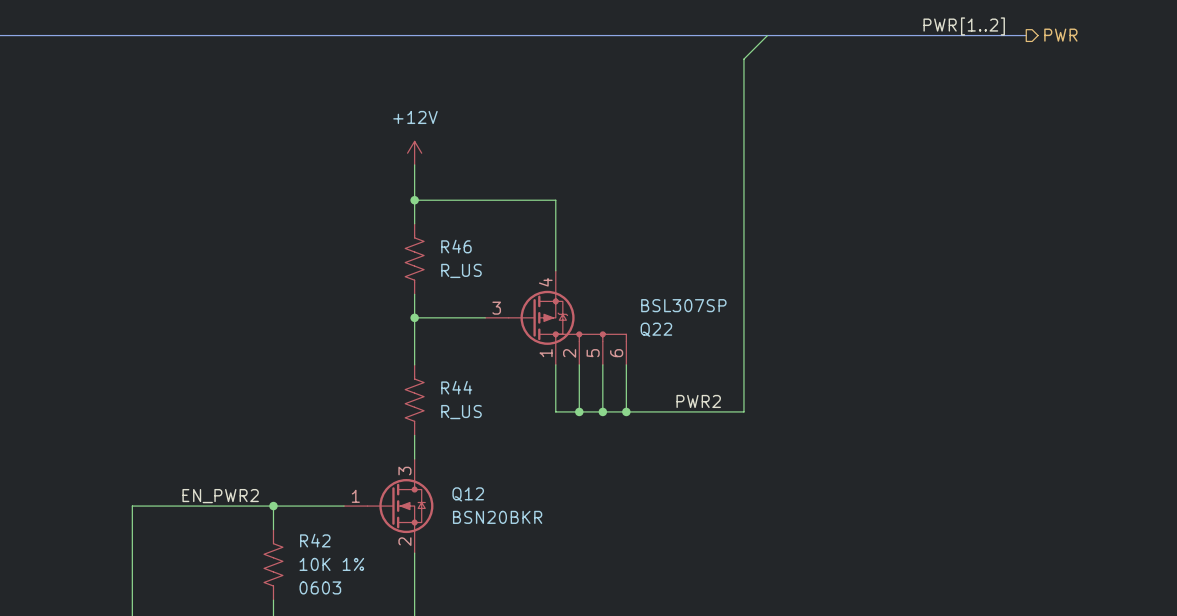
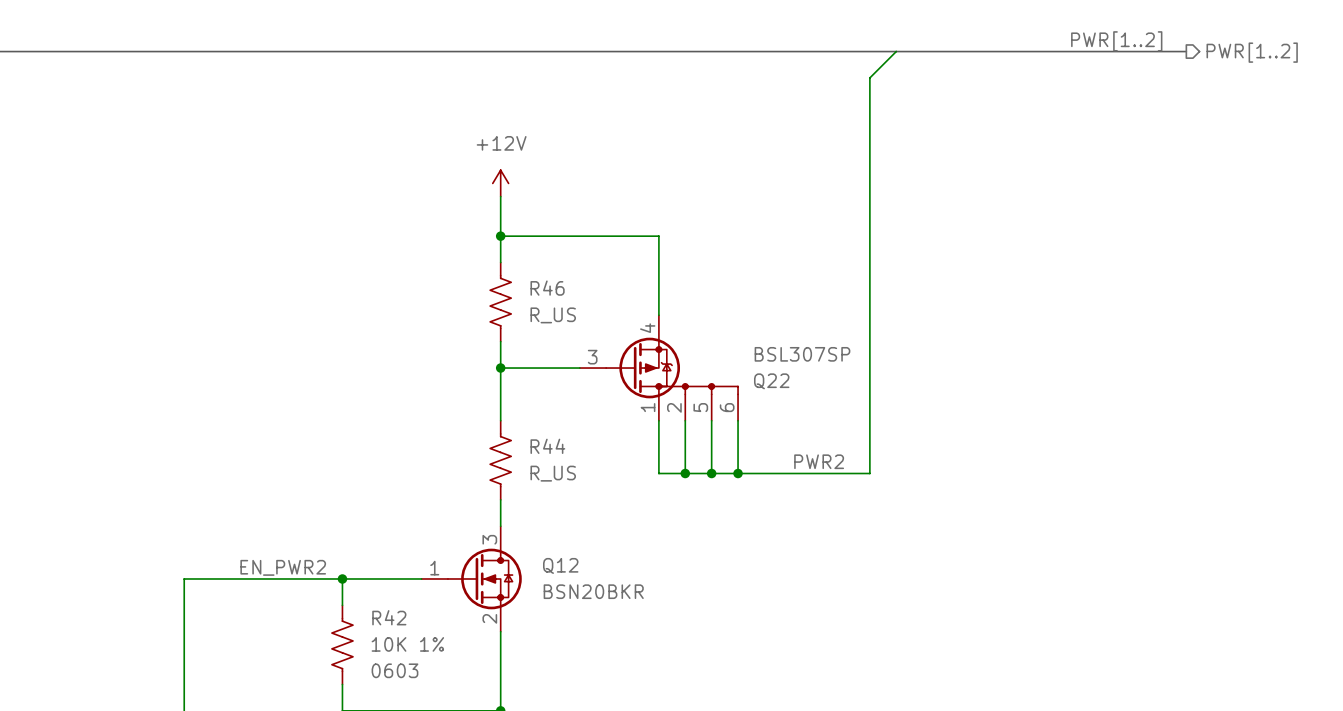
hierarchical label: PWR (1060, 35) -> PWR[1..2] (1252, 52)

